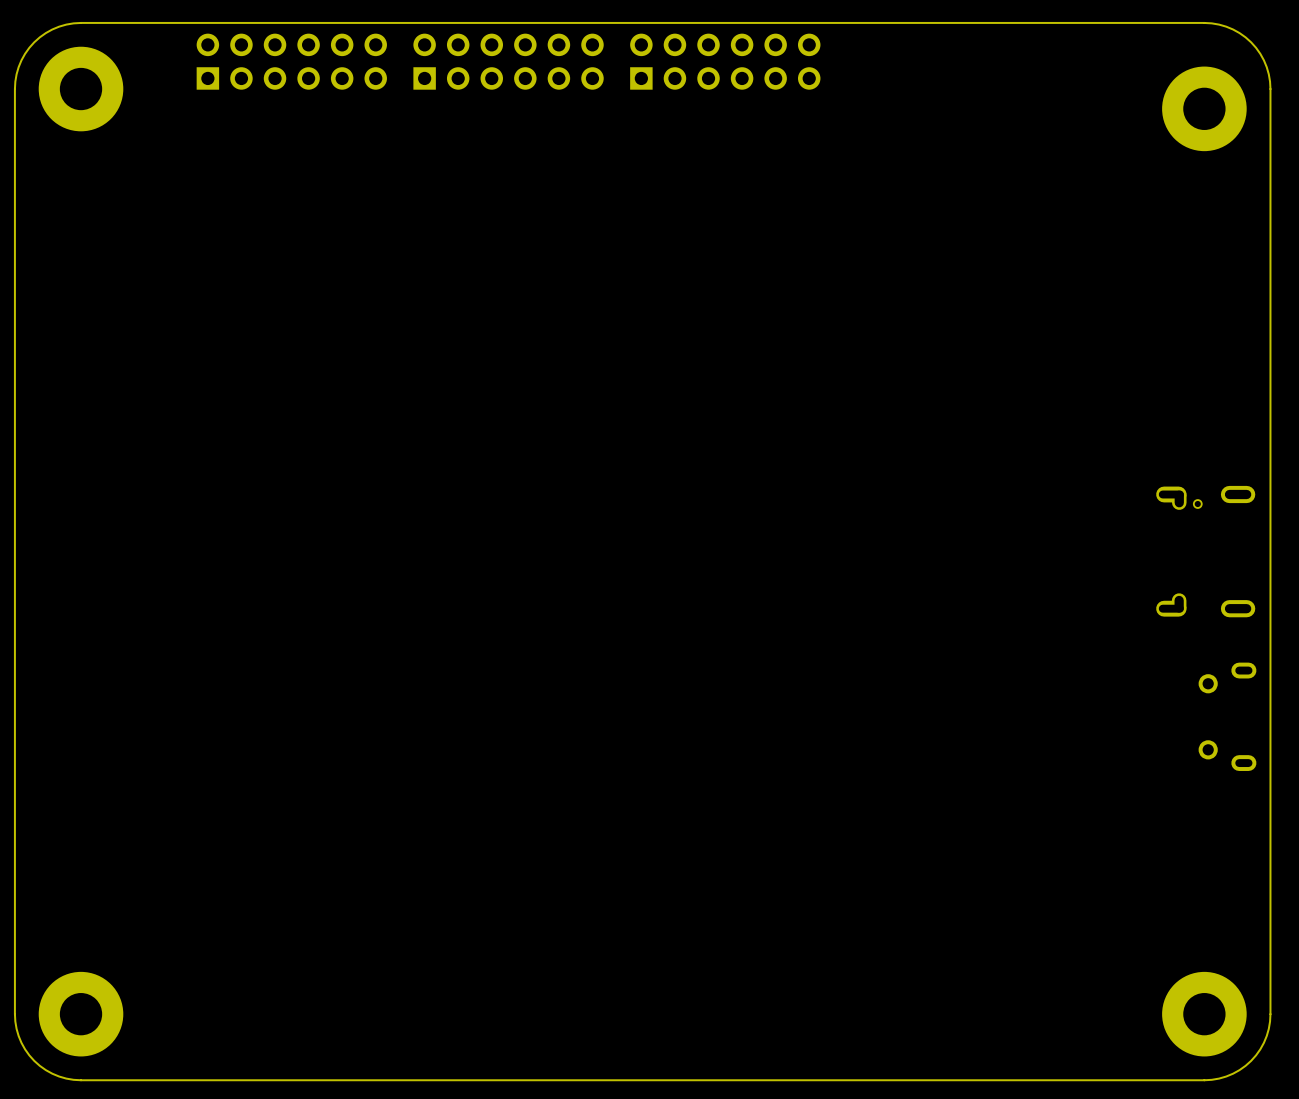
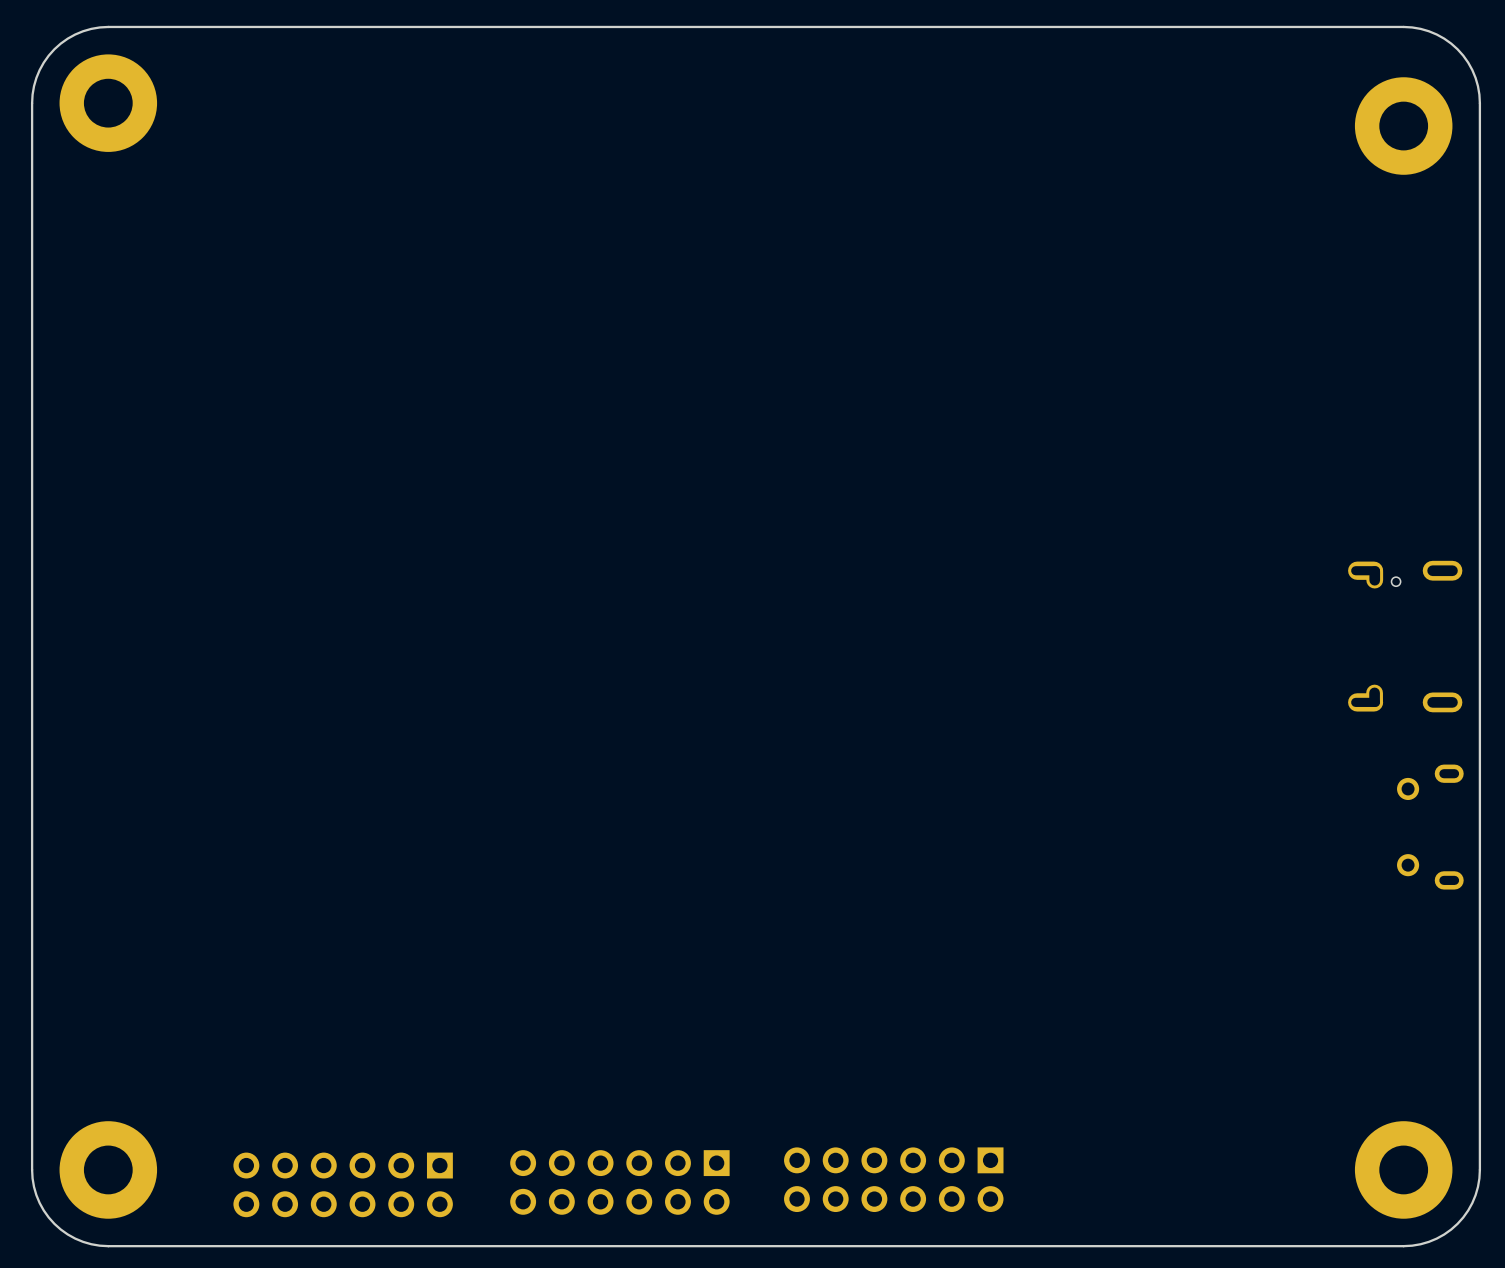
part: (291, 61) -> none
part: (508, 61) -> none
part: (725, 61) -> none
part: none -> (893, 1179)
part: none -> (619, 1182)
part: none -> (343, 1184)

